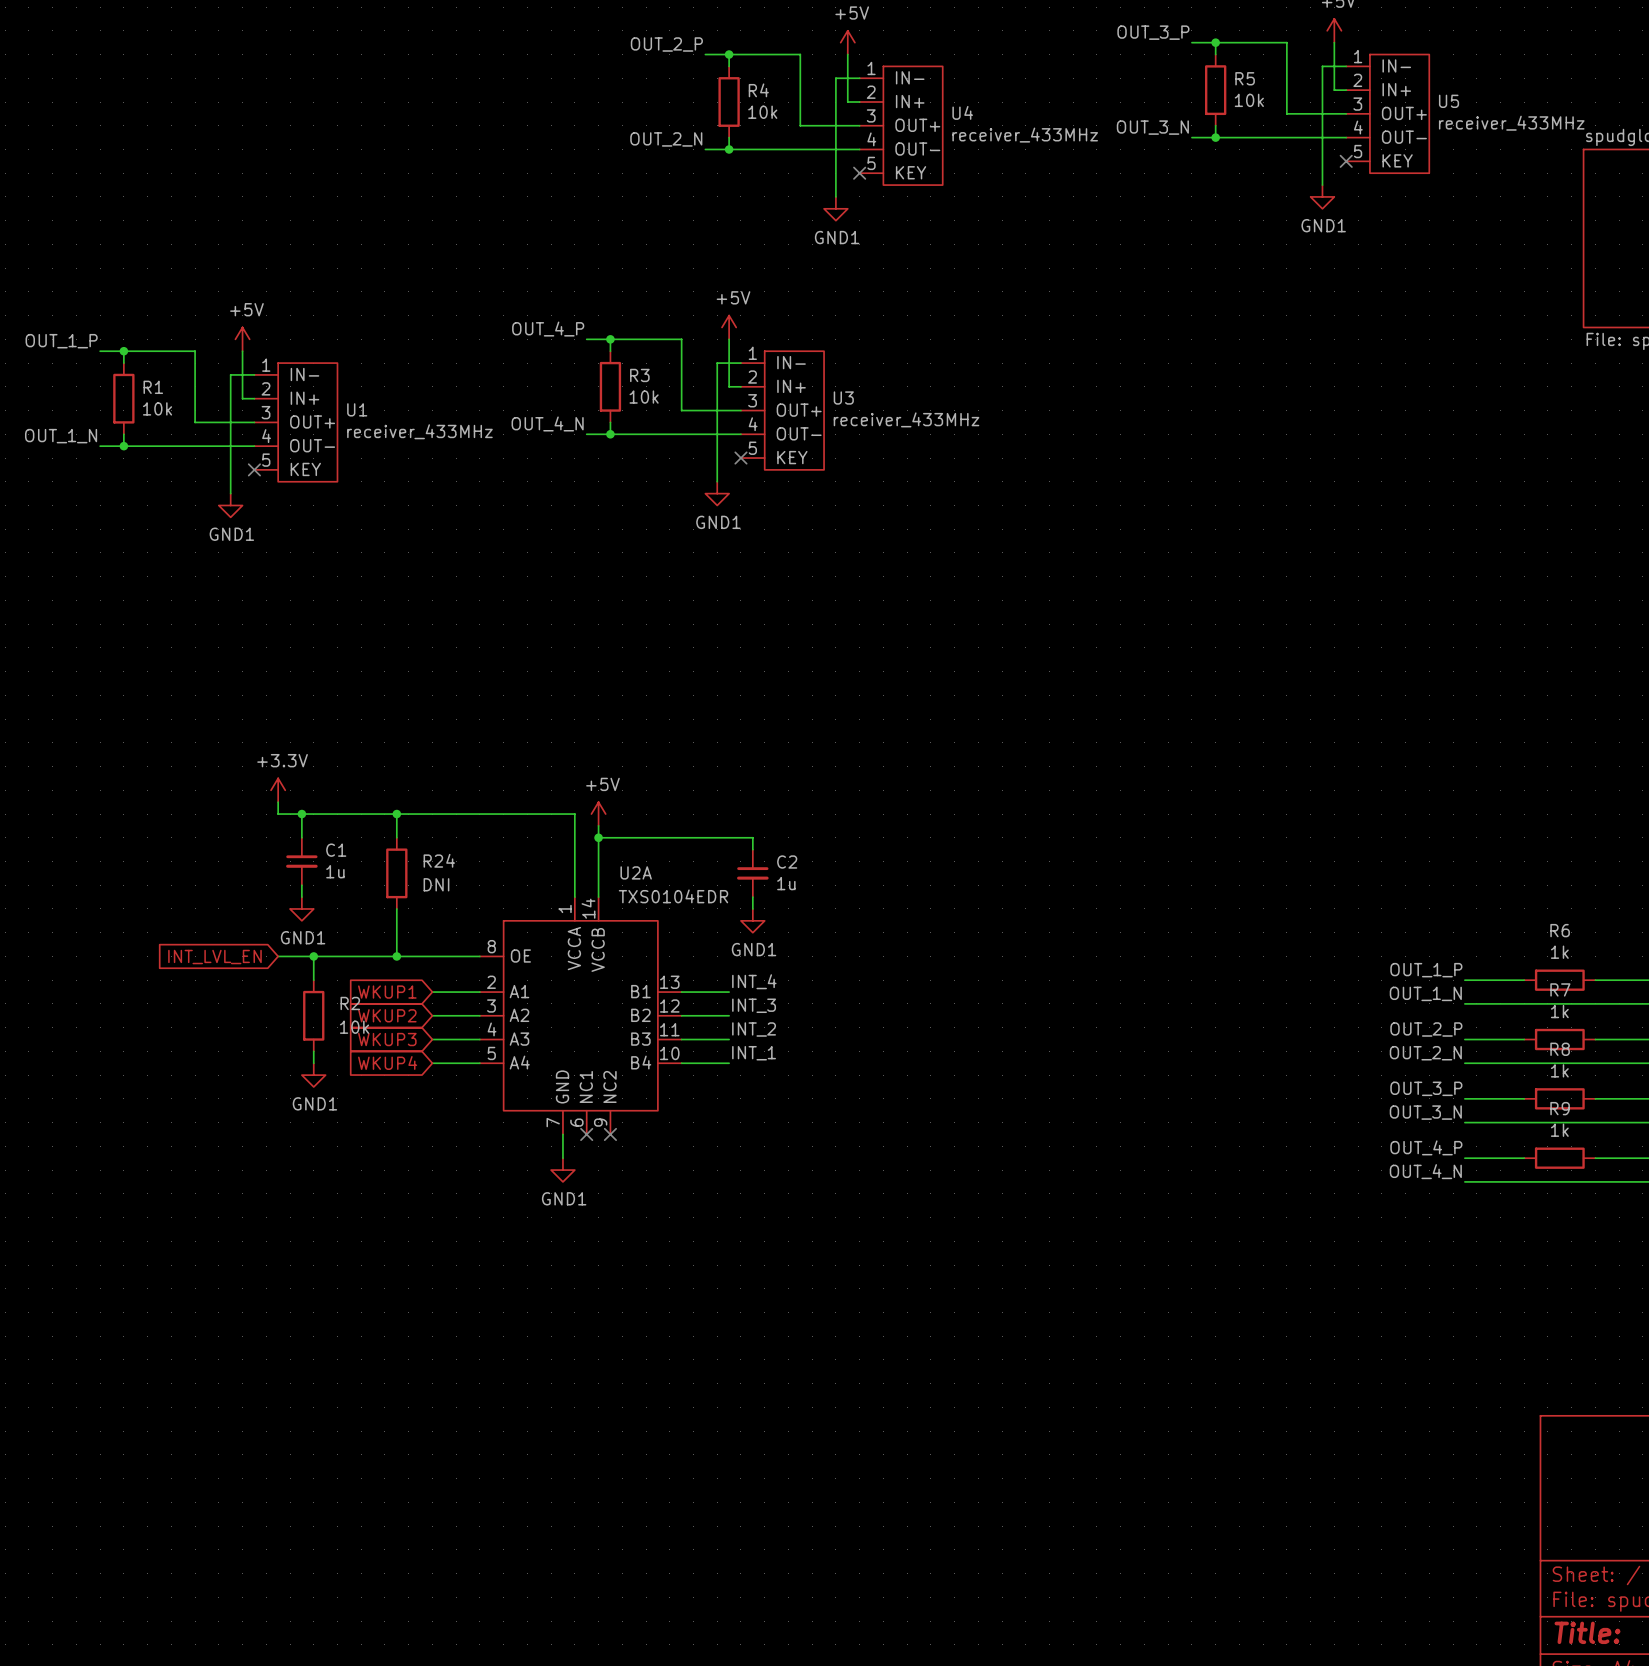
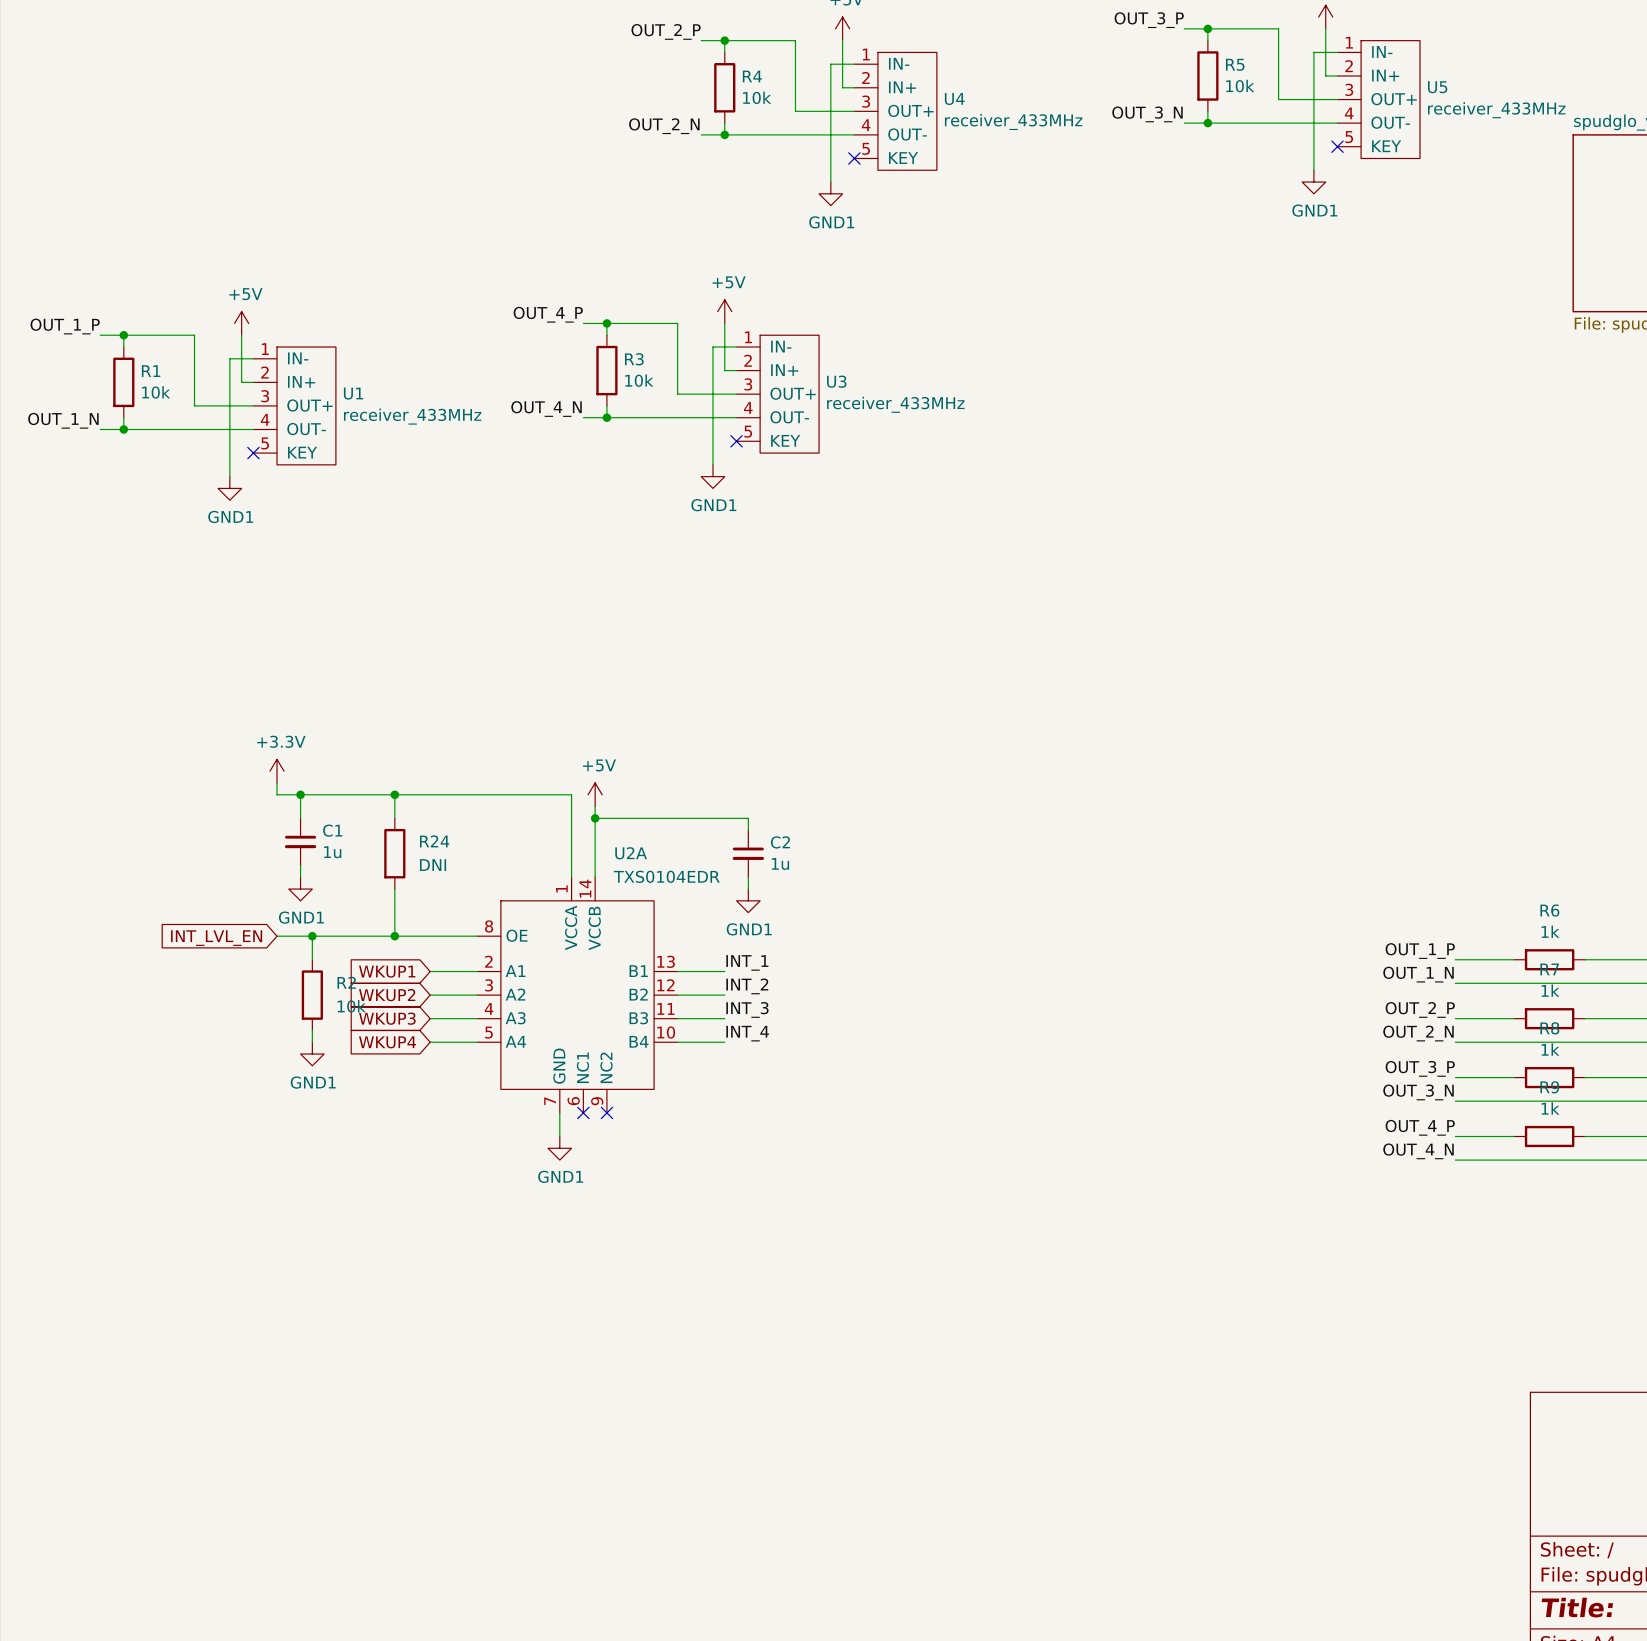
label: INT_4 (754, 981) -> INT_1 (747, 962)
label: INT_3 (754, 1005) -> INT_2 (747, 986)
label: INT_2 (754, 1029) -> INT_3 (747, 1009)
label: INT_1 (754, 1053) -> INT_4 (747, 1033)

